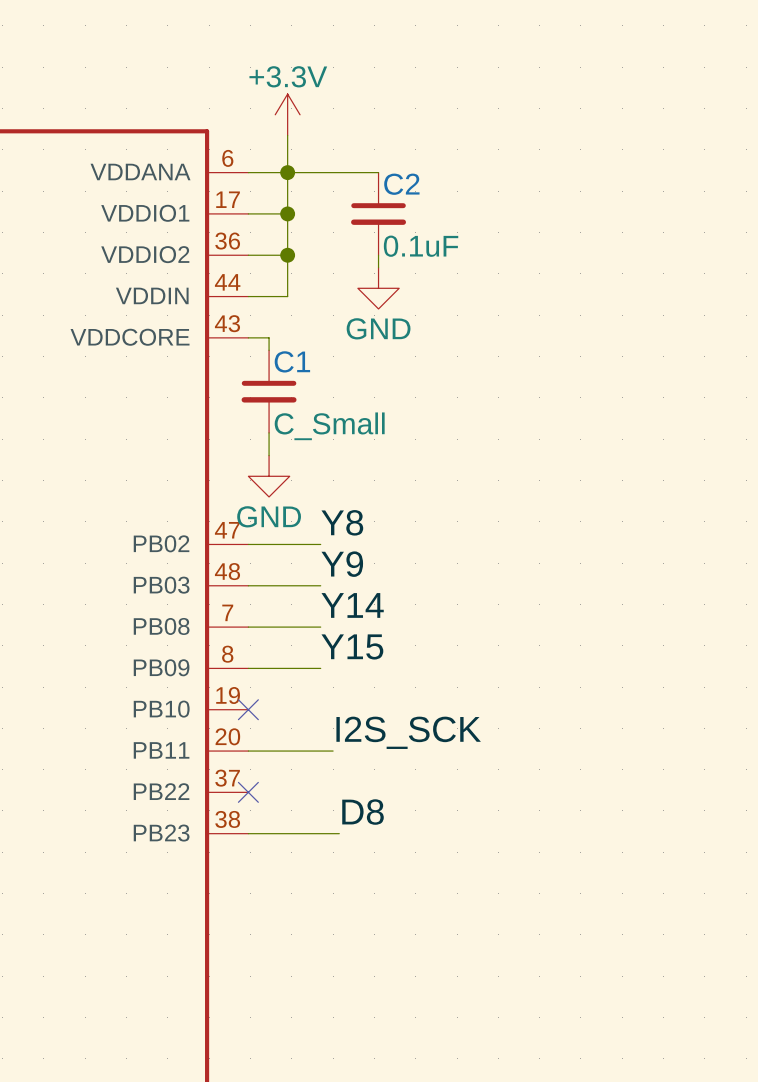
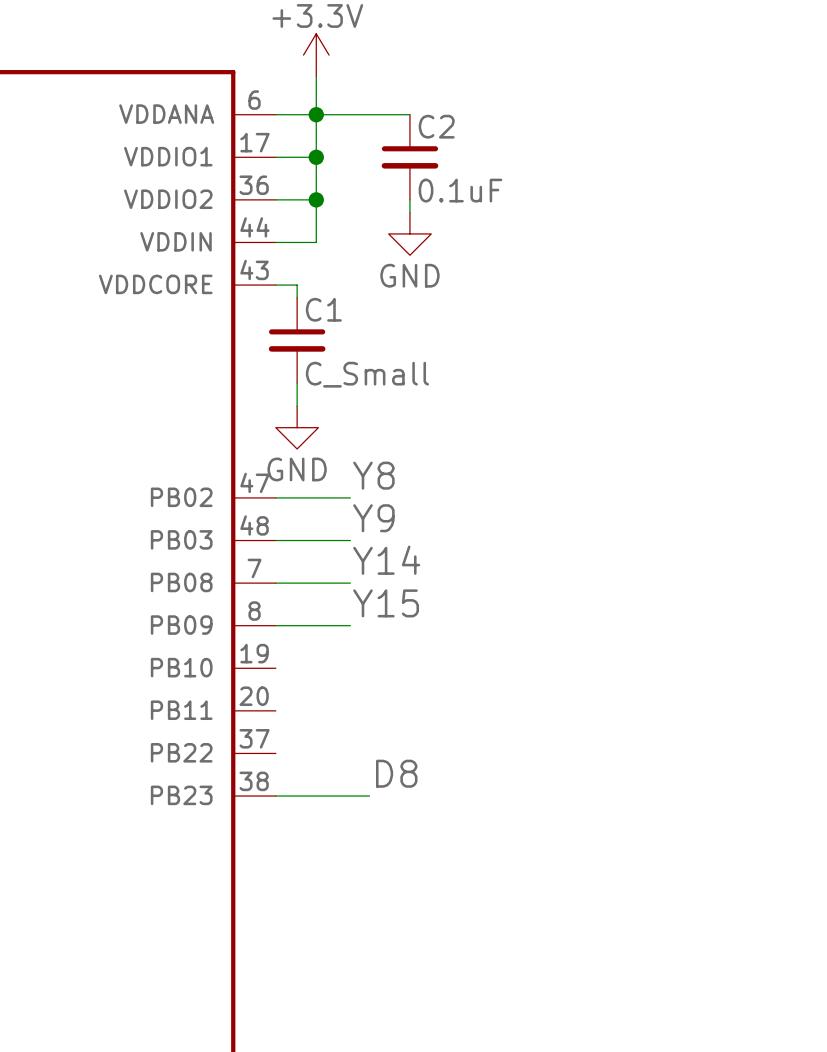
no-connect mark: (248, 709) -> none
label: I2S_SCK (408, 732) -> none
wire: (248, 751) (333, 751) -> none
no-connect mark: (248, 792) -> none

